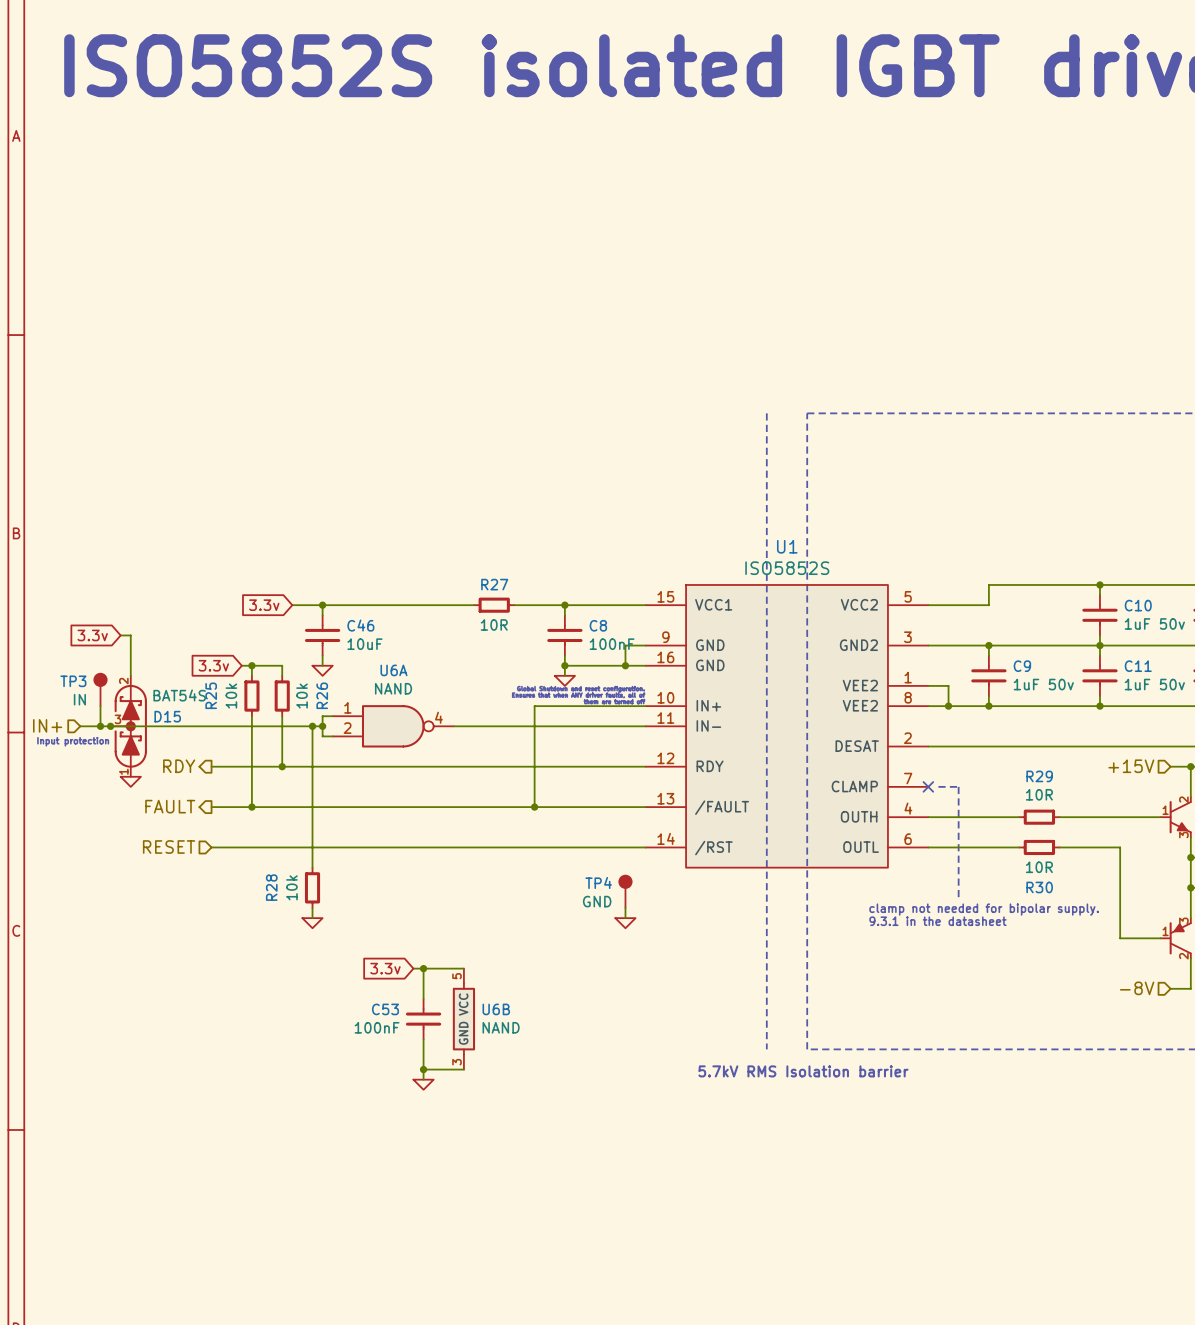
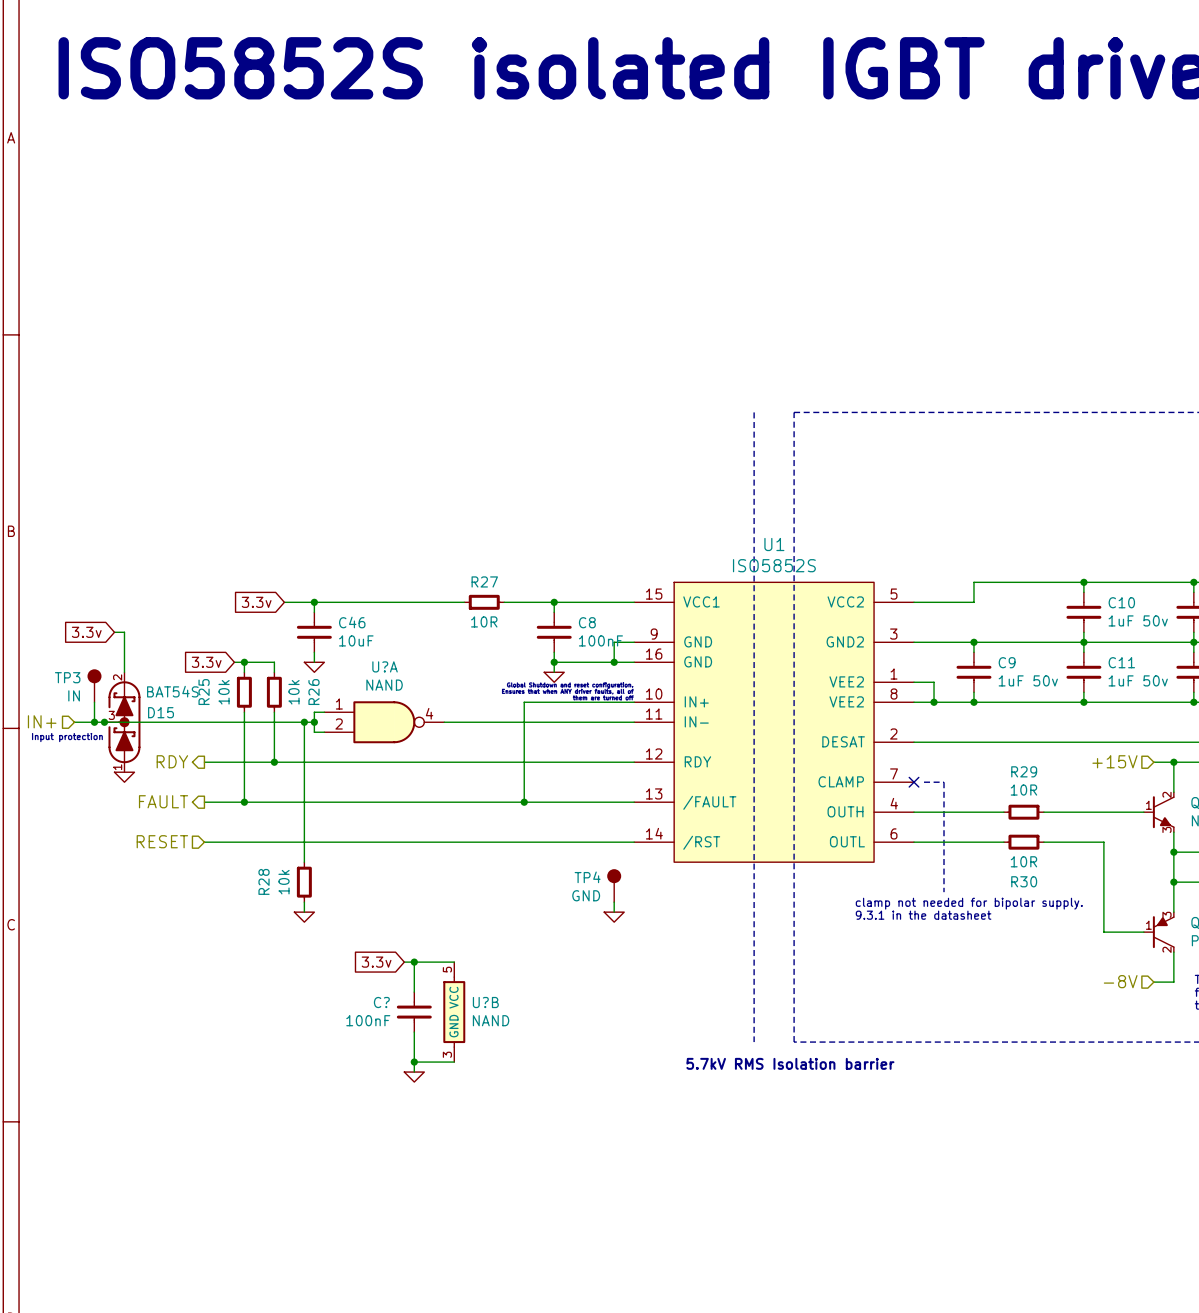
U6A name: U6A (393, 670) -> U?A (385, 666)
C53 name: C53 (385, 1009) -> C? (381, 1002)
U6B name: U6B (496, 1009) -> U?B (485, 1002)

